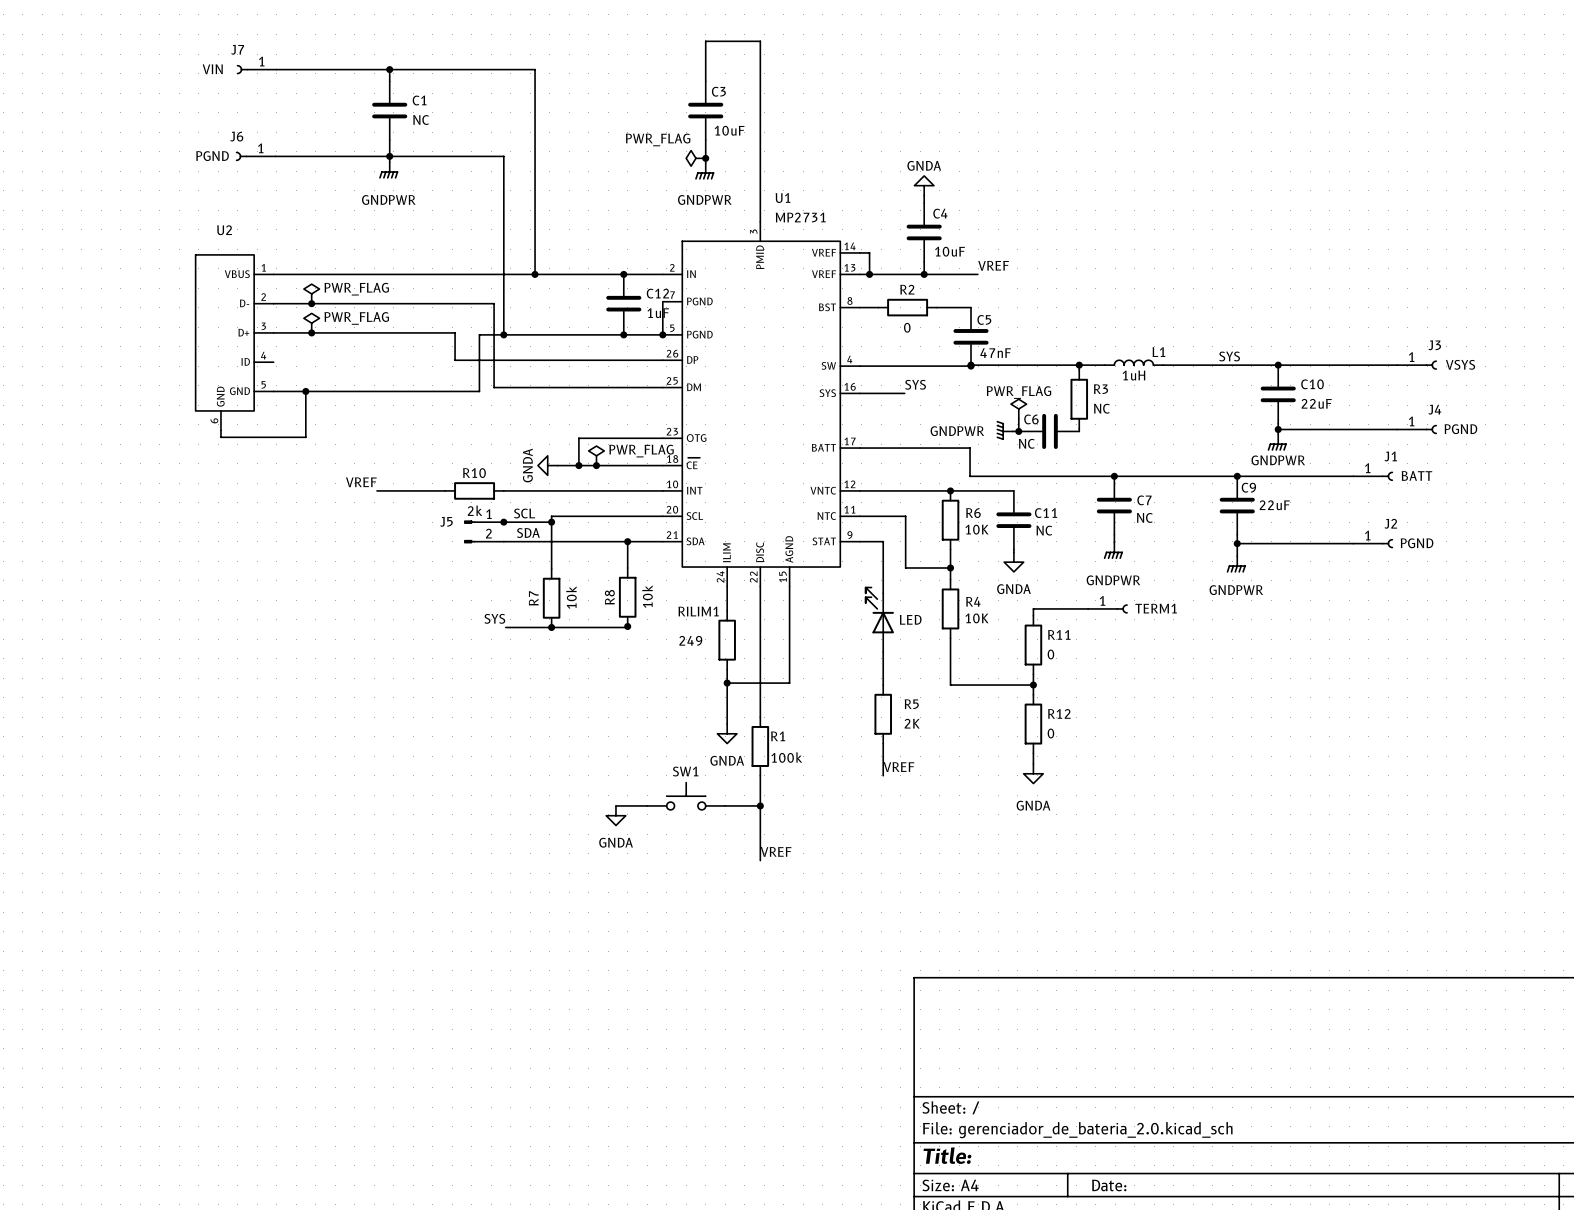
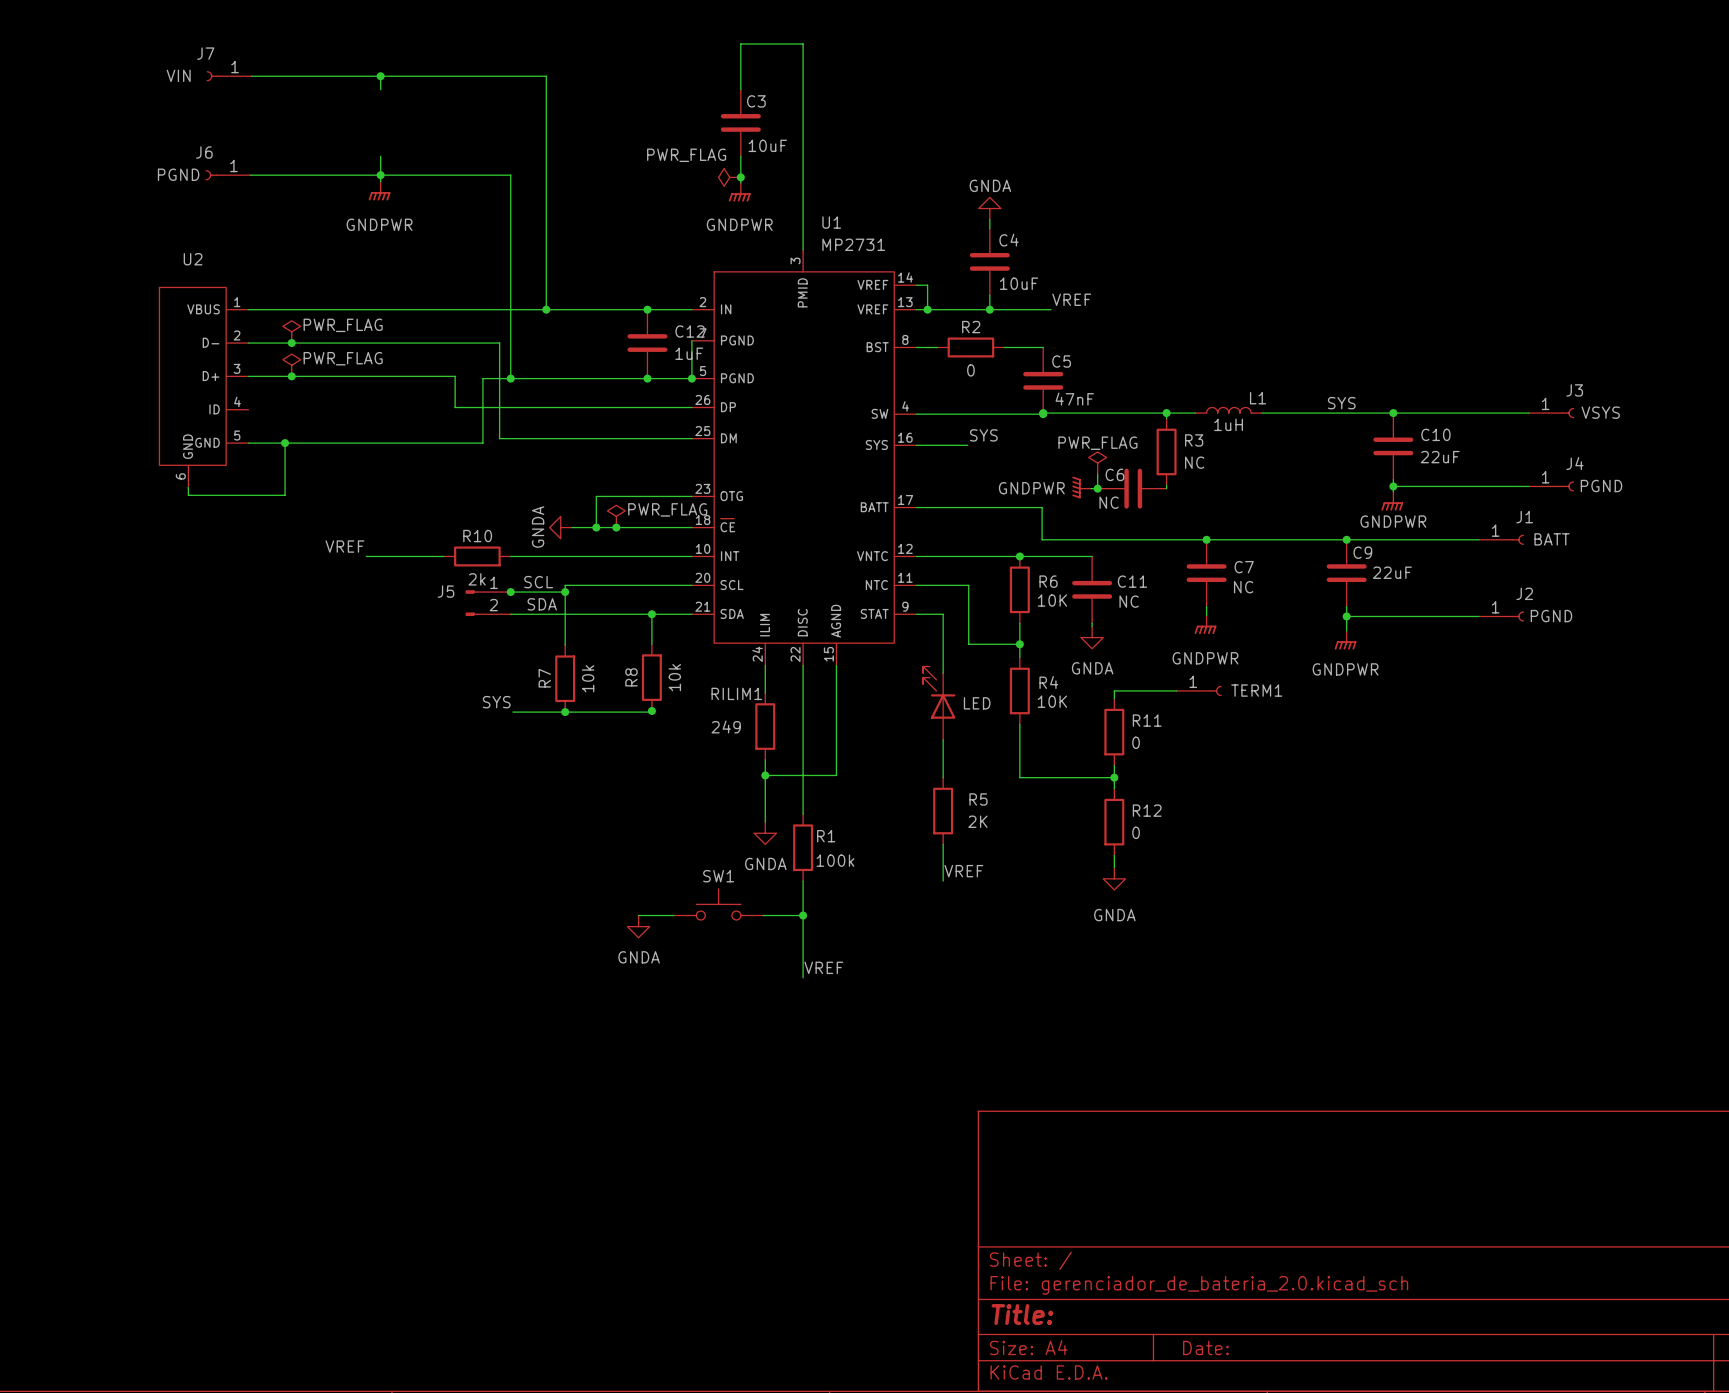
C1: NC (389, 110) -> none

